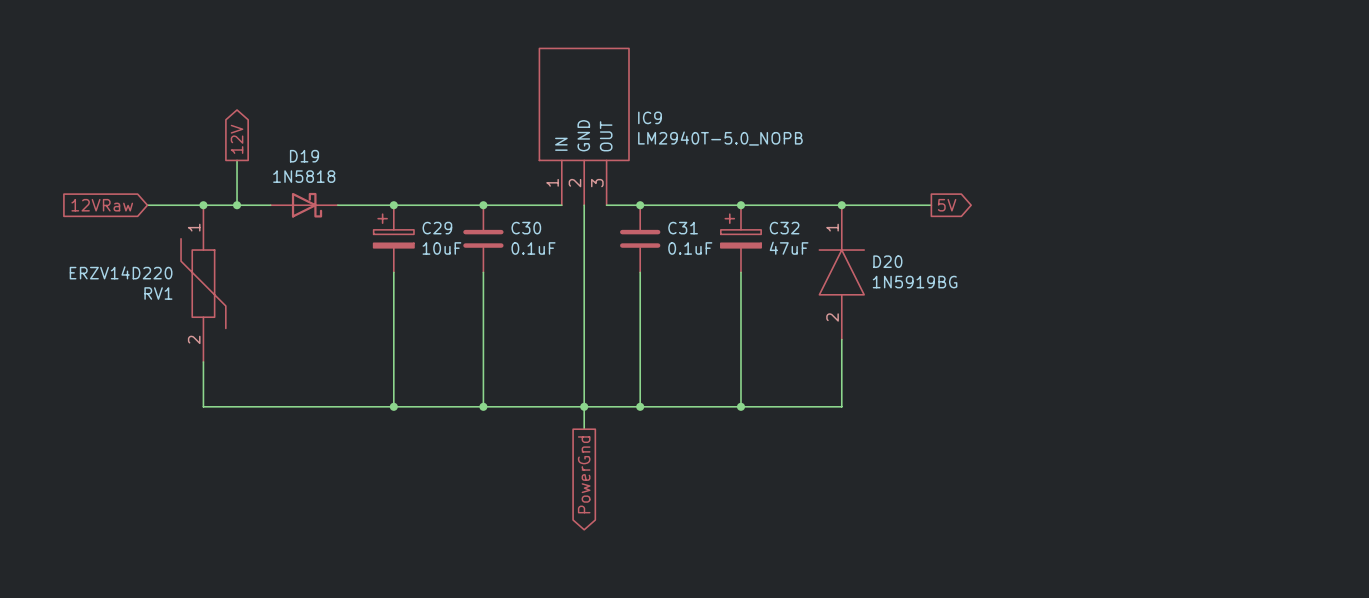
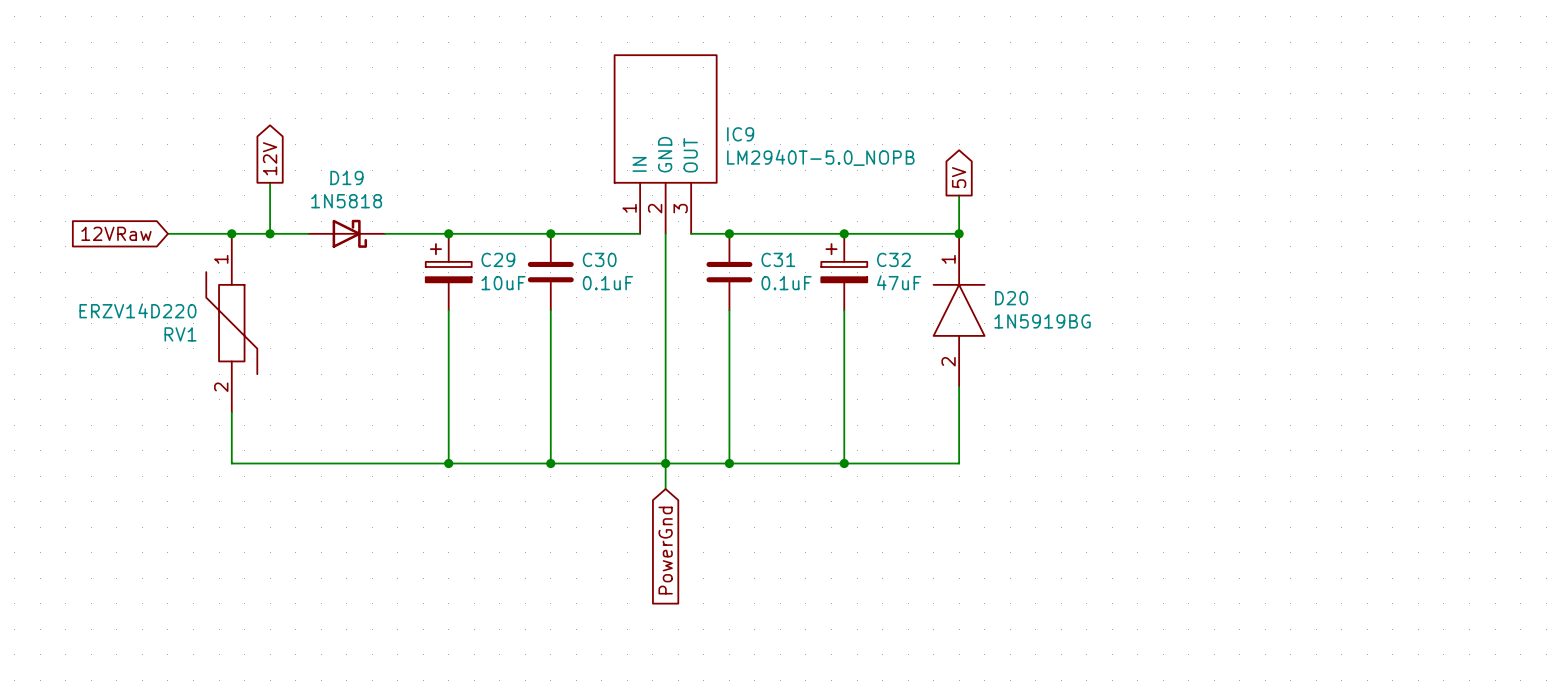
wire: (841, 205) (931, 205) -> (959, 233) (959, 195)
global label rotation: 0° (947, 205) -> 90° counterclockwise (959, 177)
global label position: 5V (947, 205) -> 5V (959, 177)
global label shape: output (584, 474) -> input (665, 550)

